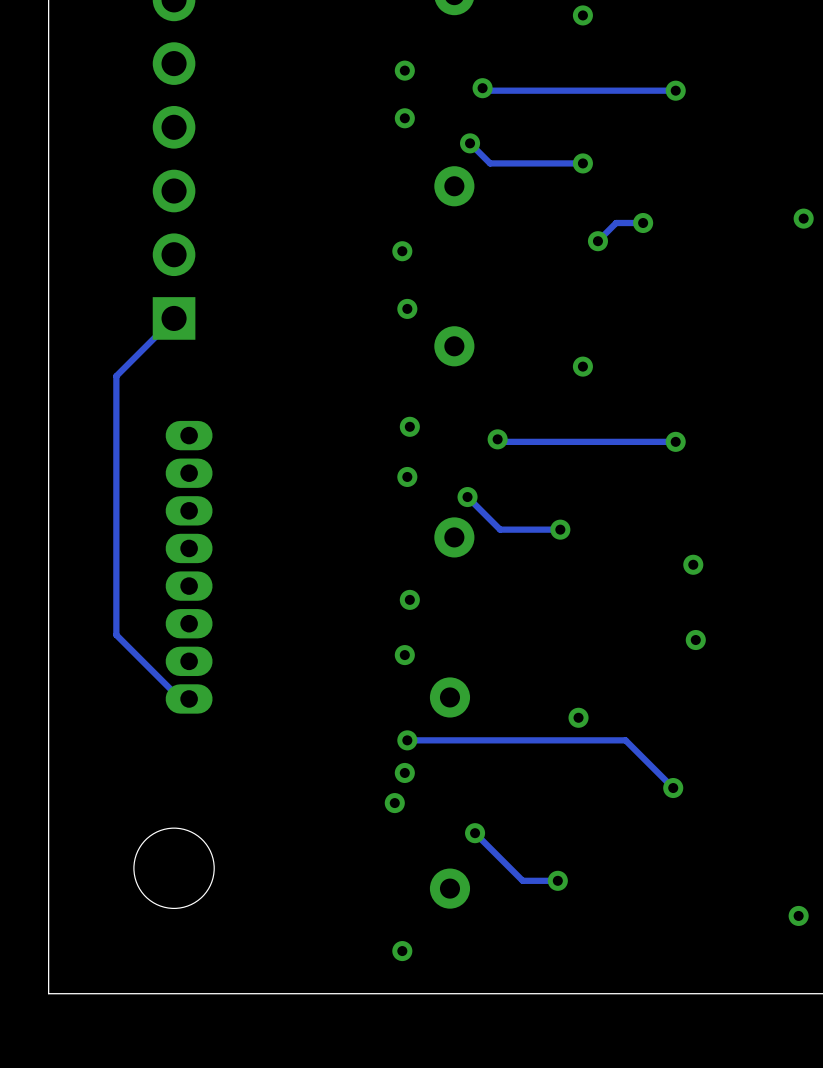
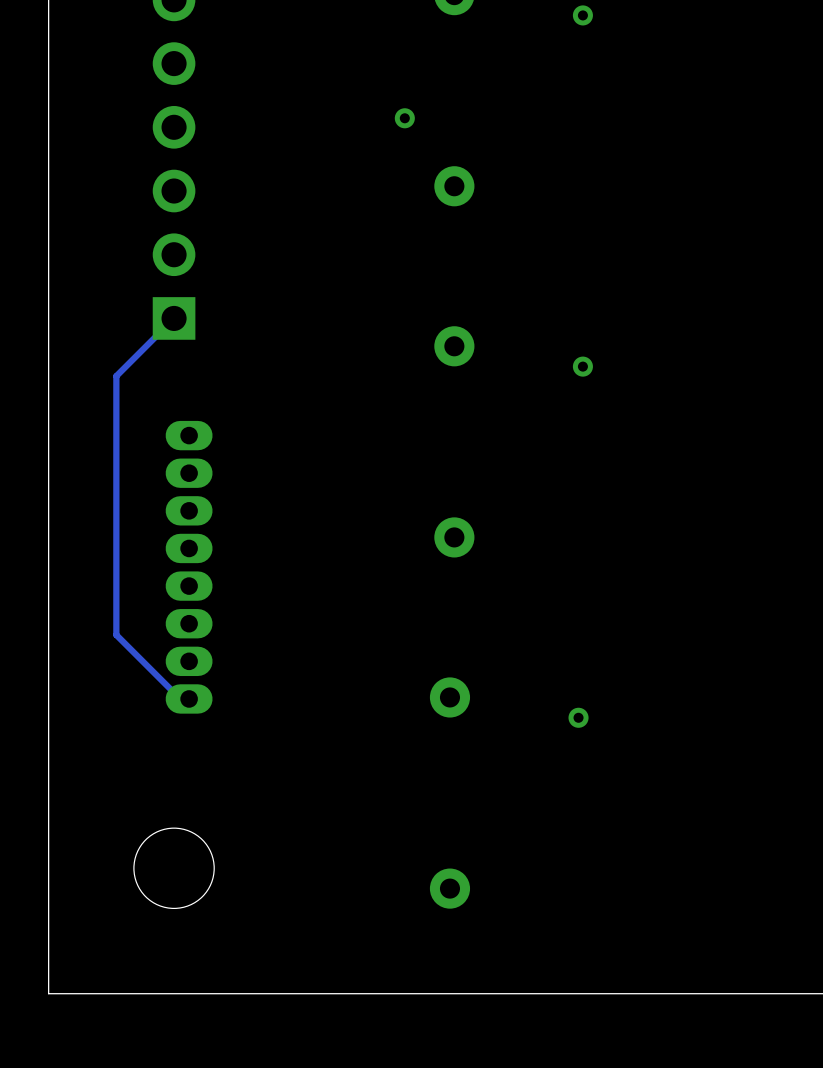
via: (404, 70) -> none
track: (482, 88) (485, 90) (675, 90) -> none
via: (482, 88) -> none
via: (675, 90) -> none
track: (470, 143) (490, 163) (582, 163) -> none
via: (470, 143) -> none
via: (582, 163) -> none
via: (803, 218) -> none
track: (643, 223) (616, 223) (597, 241) -> none
via: (643, 223) -> none
via: (597, 241) -> none
via: (402, 251) -> none
via: (407, 308) -> none
via: (409, 426) -> none
track: (497, 439) (500, 441) (675, 441) -> none
via: (497, 439) -> none
via: (675, 441) -> none
via: (407, 476) -> none
track: (467, 497) (500, 529) (560, 529) -> none
via: (467, 497) -> none
via: (560, 529) -> none
via: (693, 564) -> none
via: (409, 599) -> none
via: (695, 640) -> none
via: (404, 655) -> none
track: (407, 740) (625, 740) (673, 788) -> none
via: (407, 740) -> none
via: (404, 772) -> none
via: (673, 788) -> none
via: (394, 803) -> none
track: (475, 833) (522, 880) (557, 880) -> none
via: (475, 833) -> none
via: (557, 880) -> none
via: (798, 915) -> none
via: (402, 951) -> none

